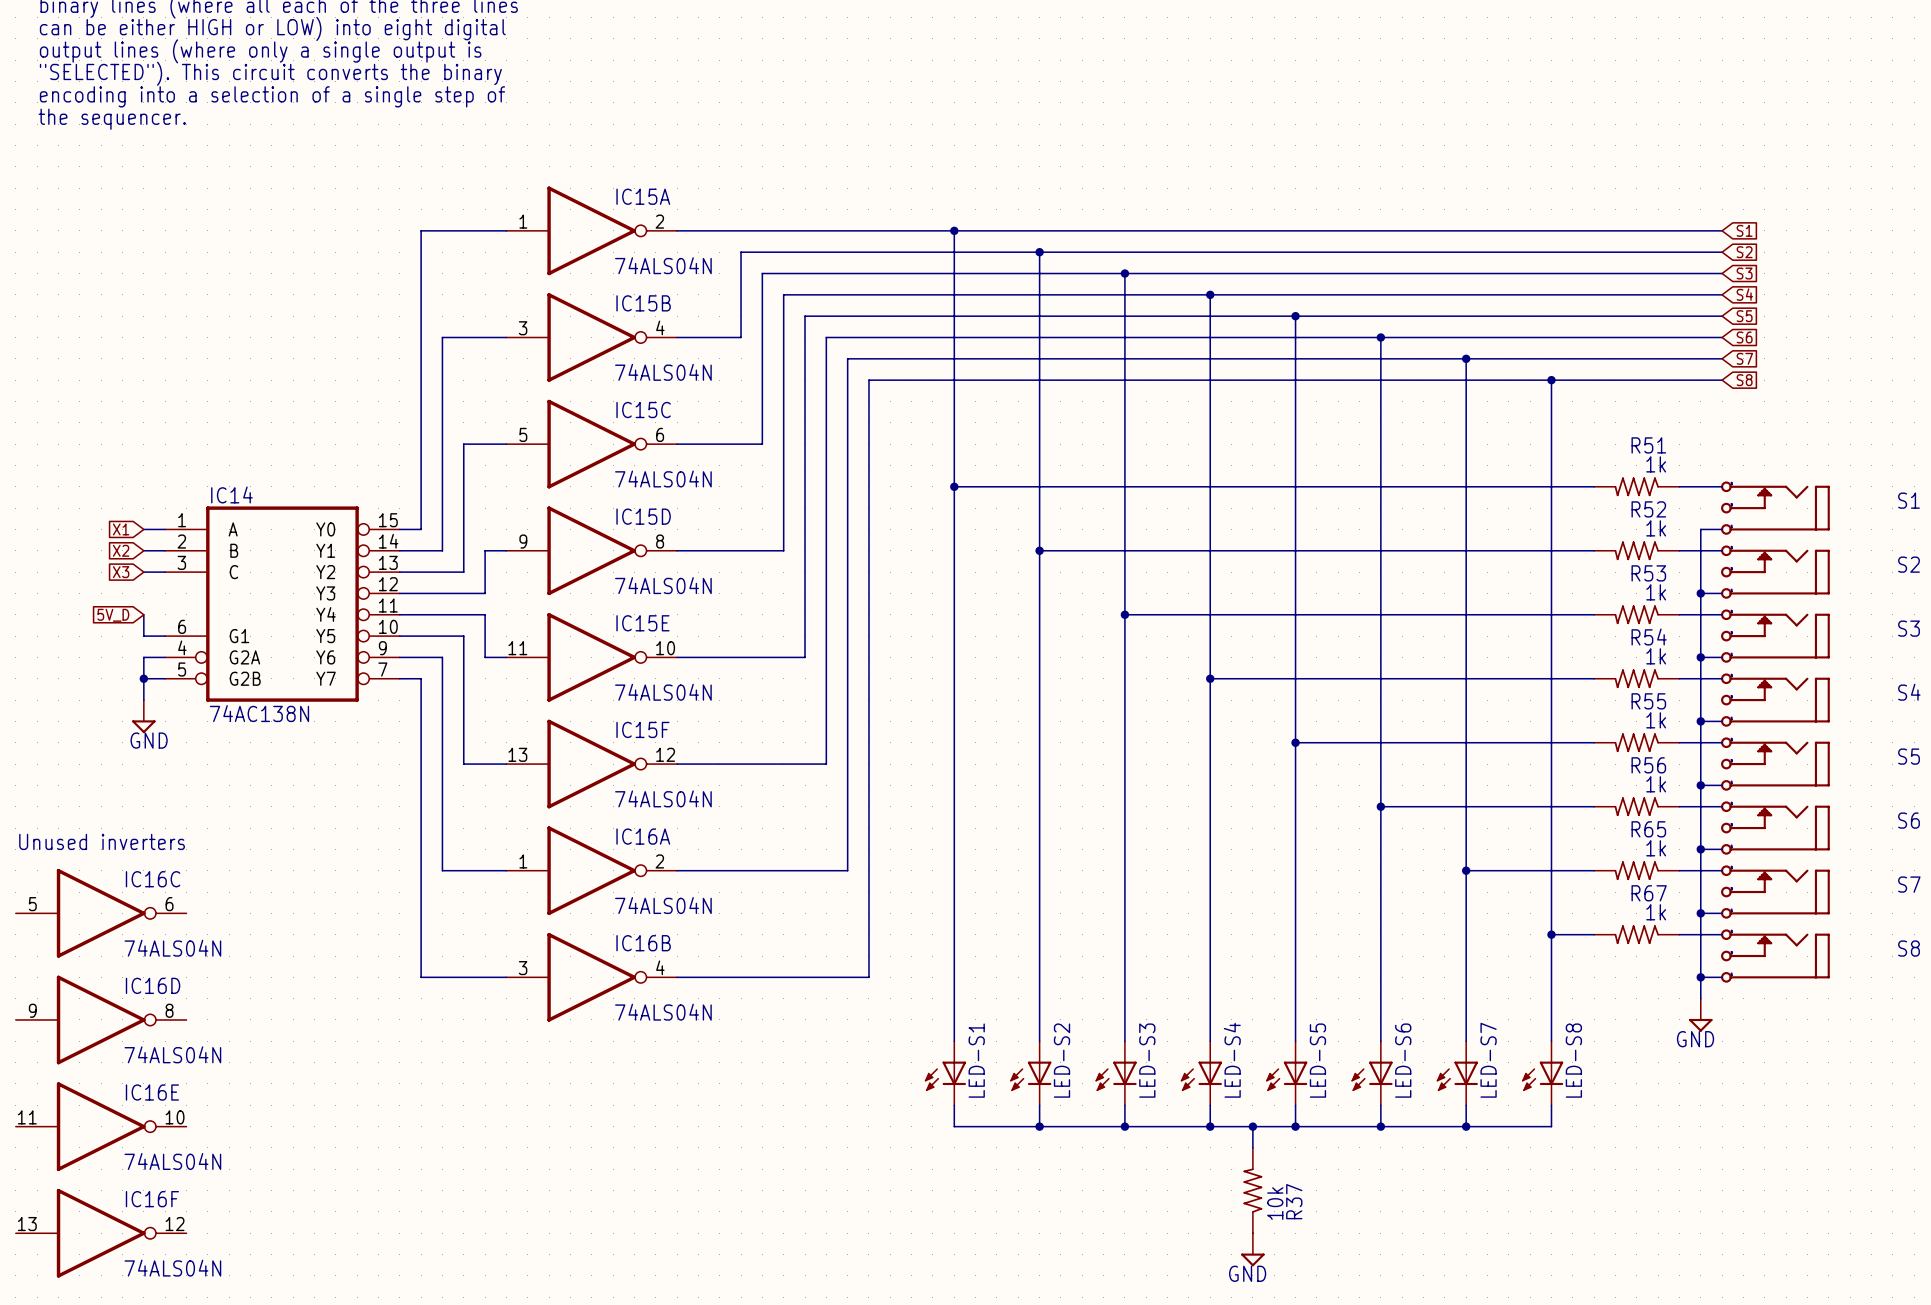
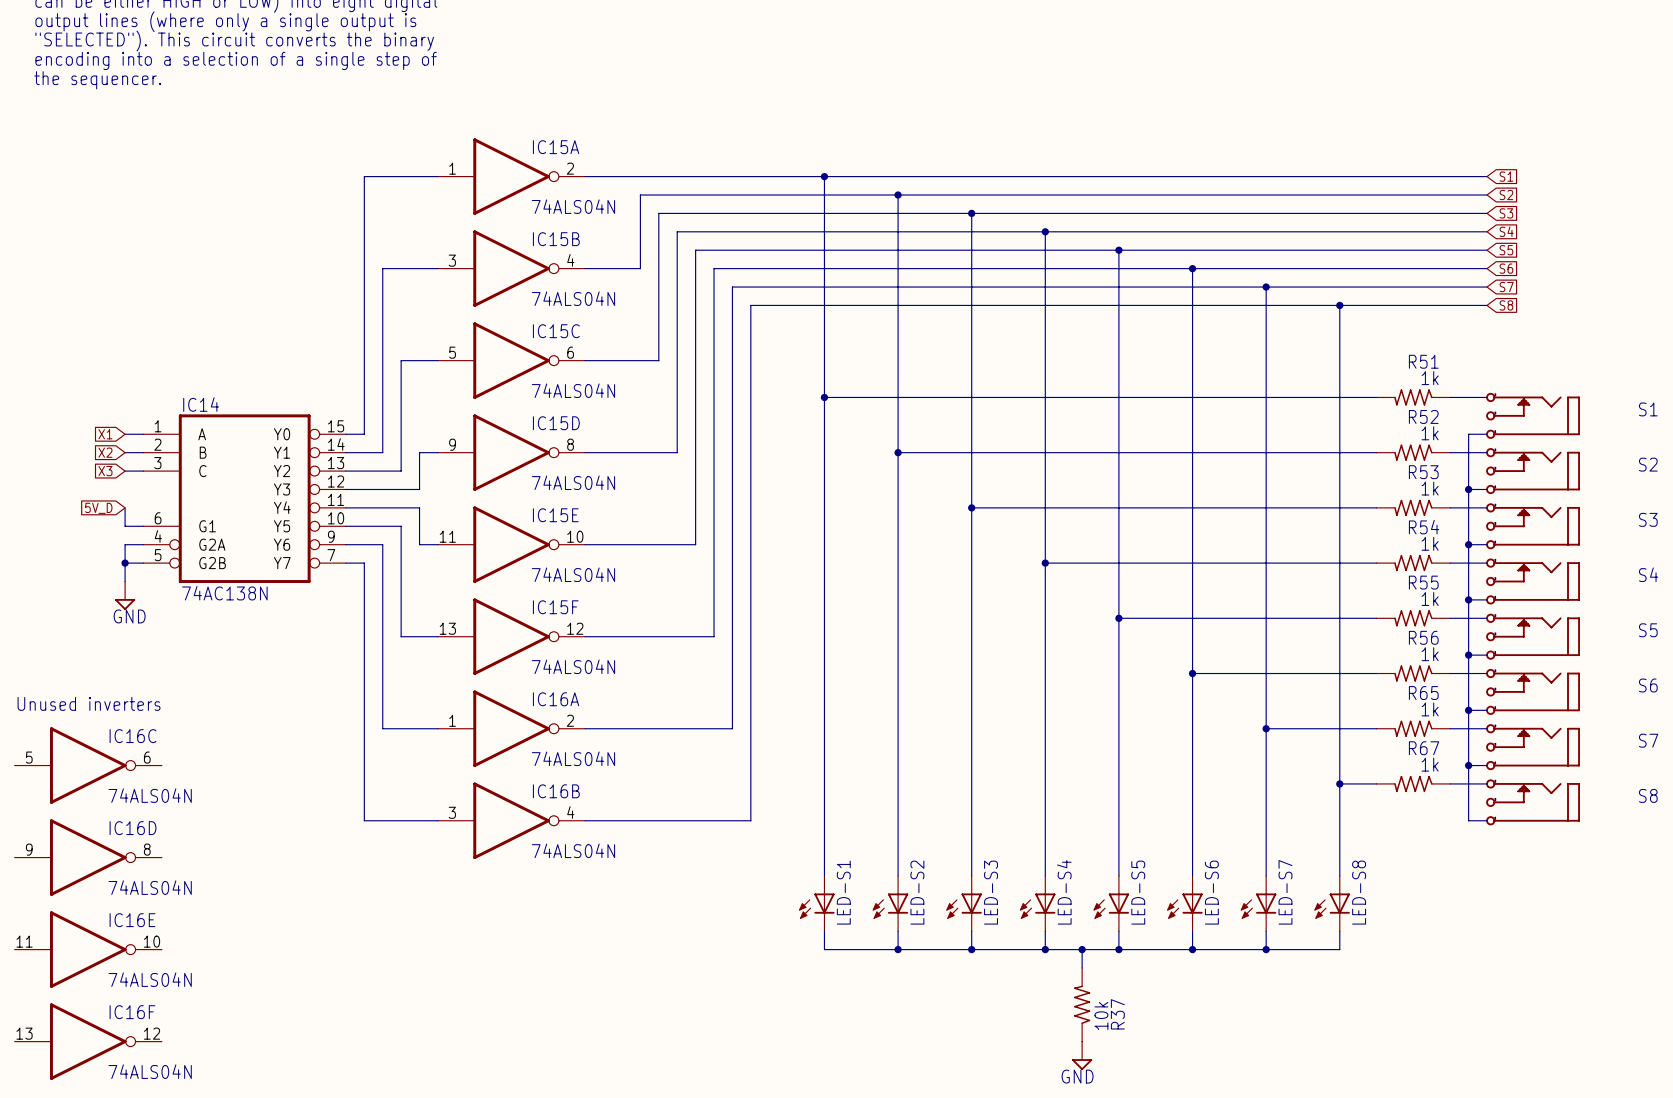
wire: (1700, 977) (1700, 998) -> none
junction: (1700, 977) -> none
power symbol: GND (1700, 1015) -> none

